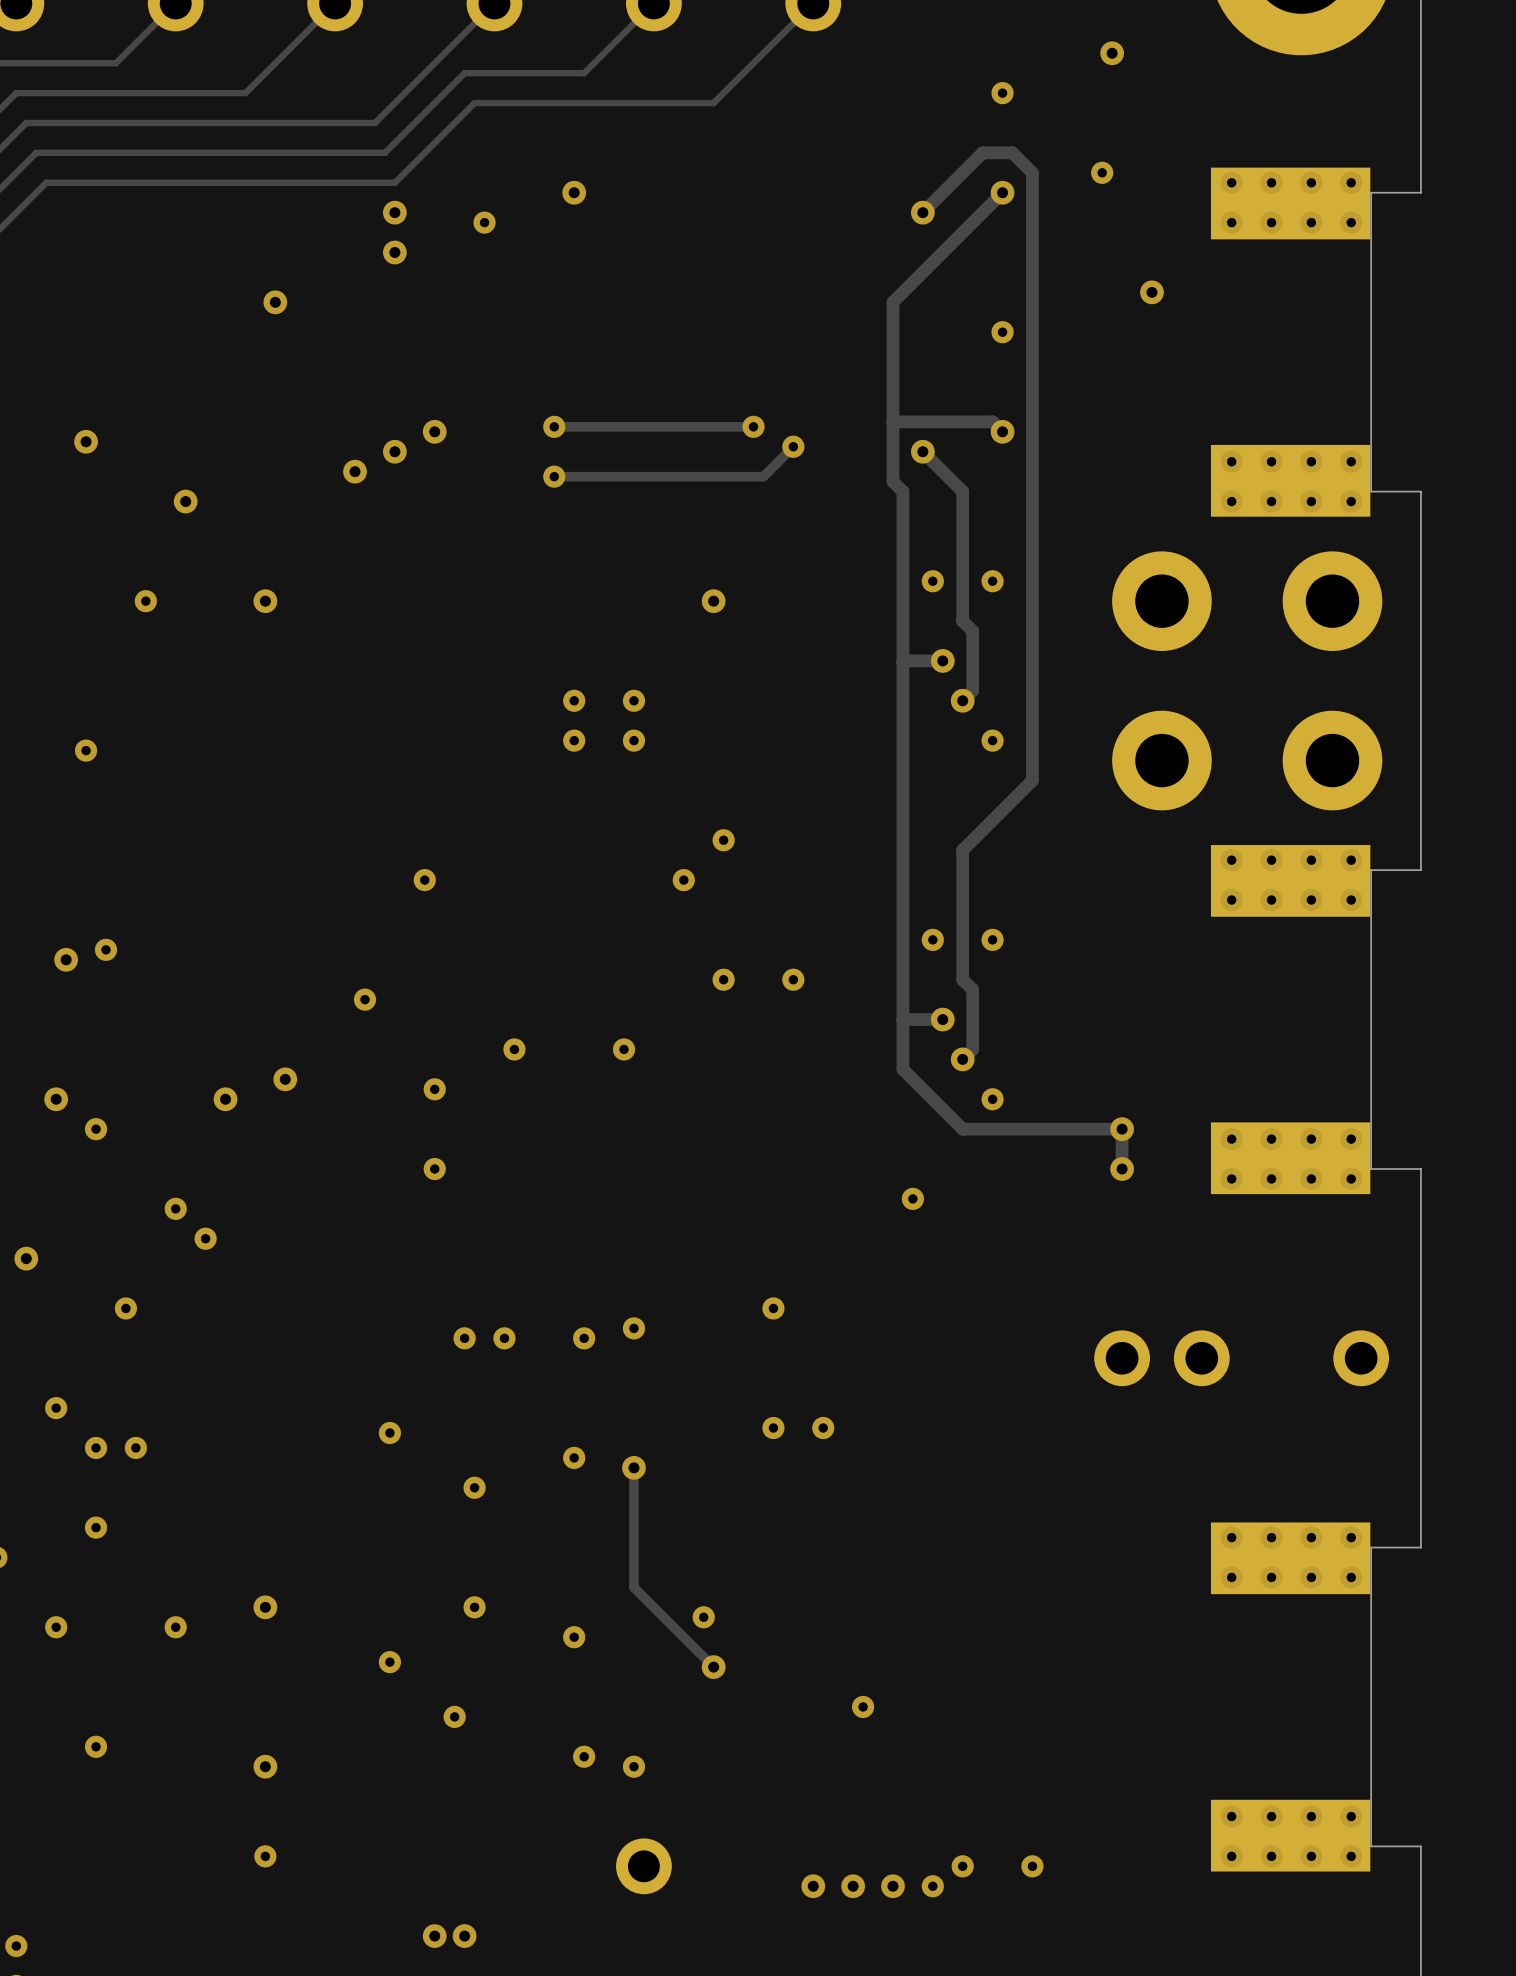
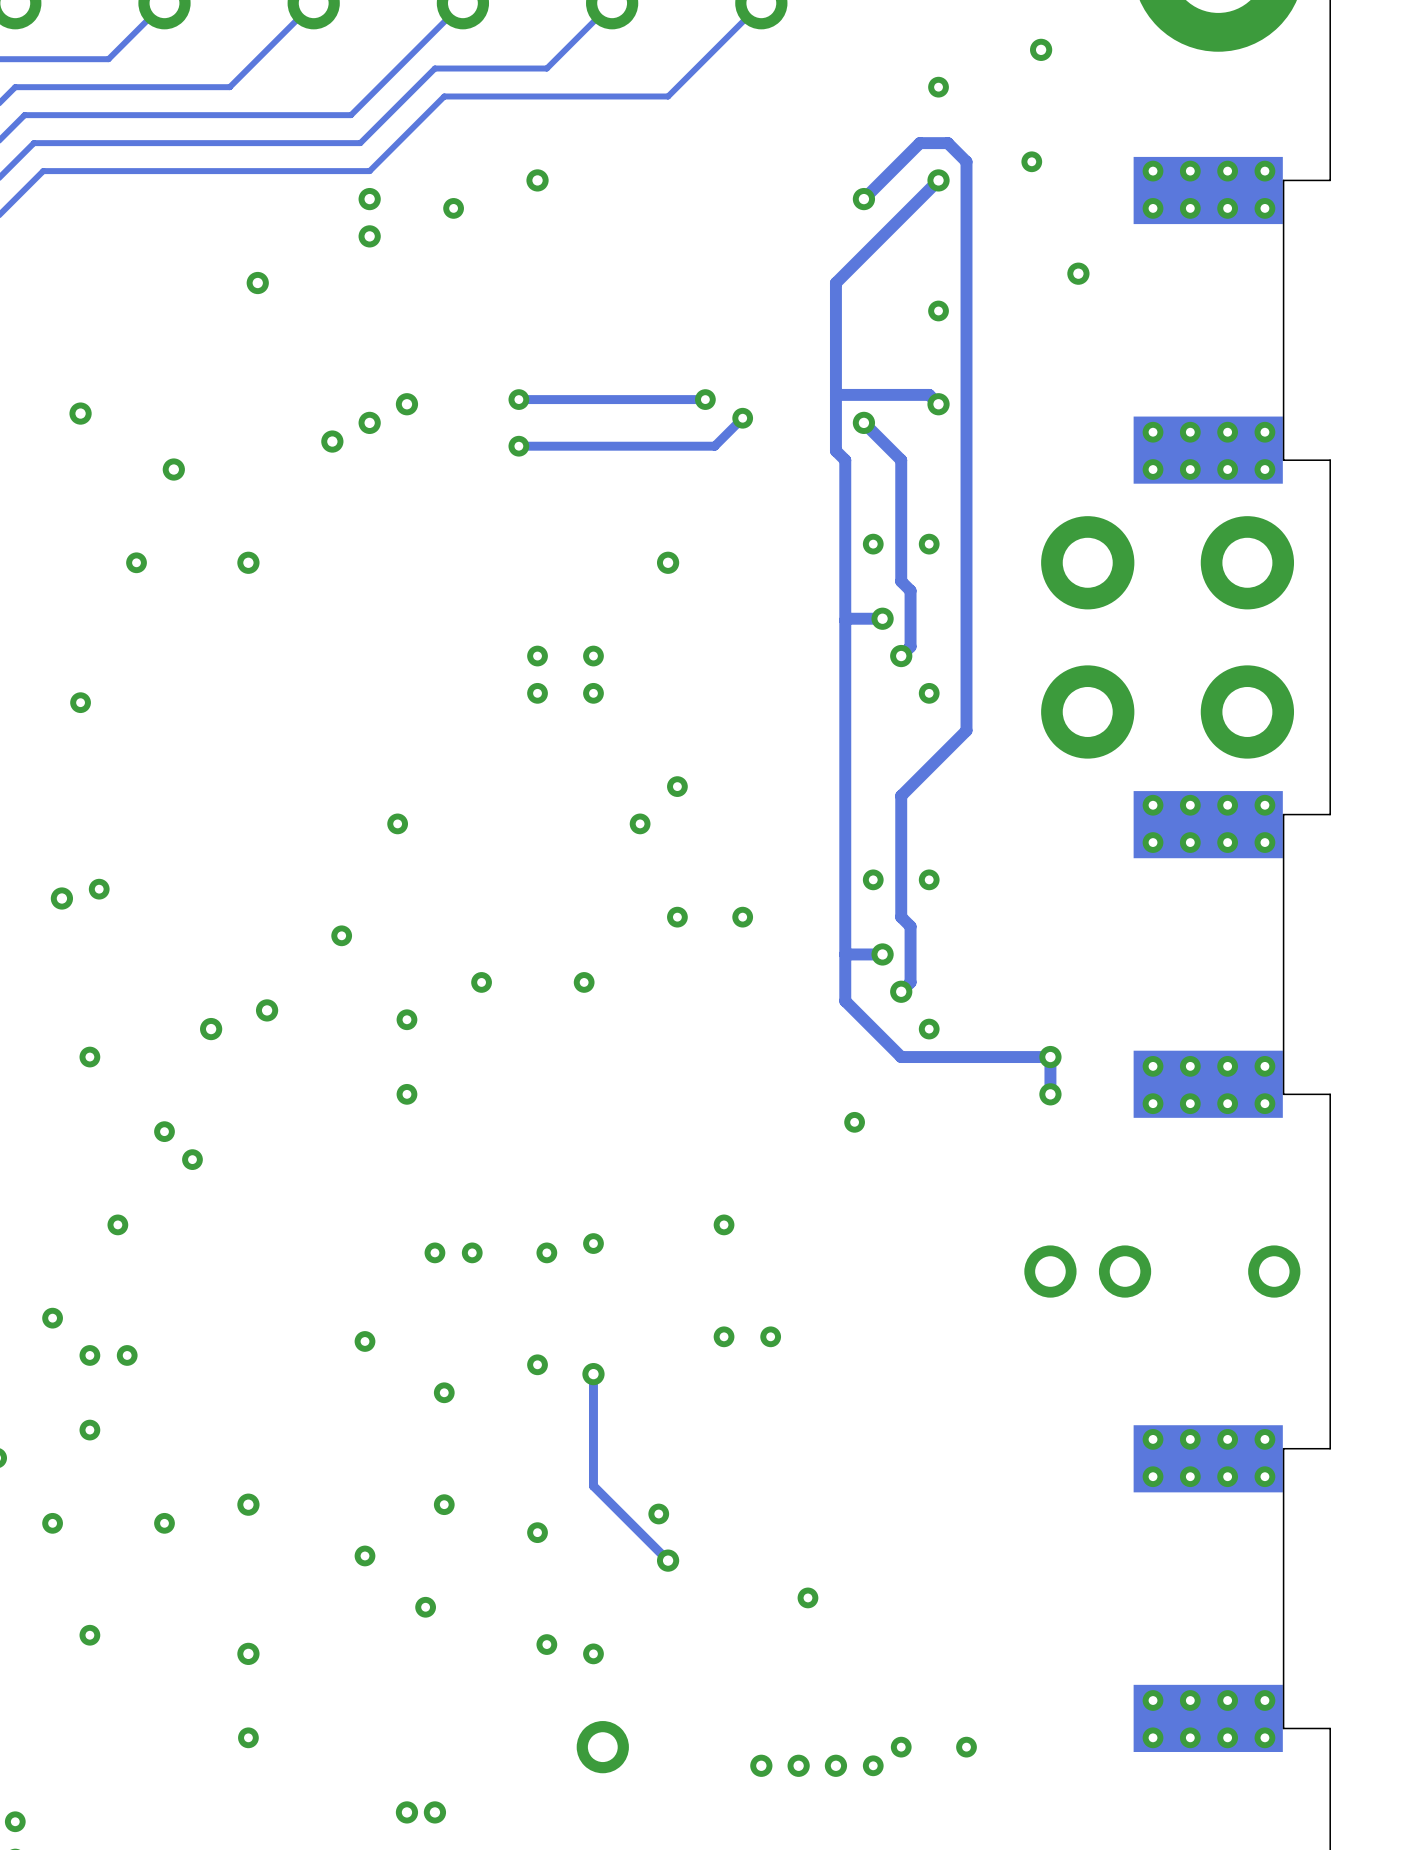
via: (56, 1099) -> none
via: (26, 1258) -> none

